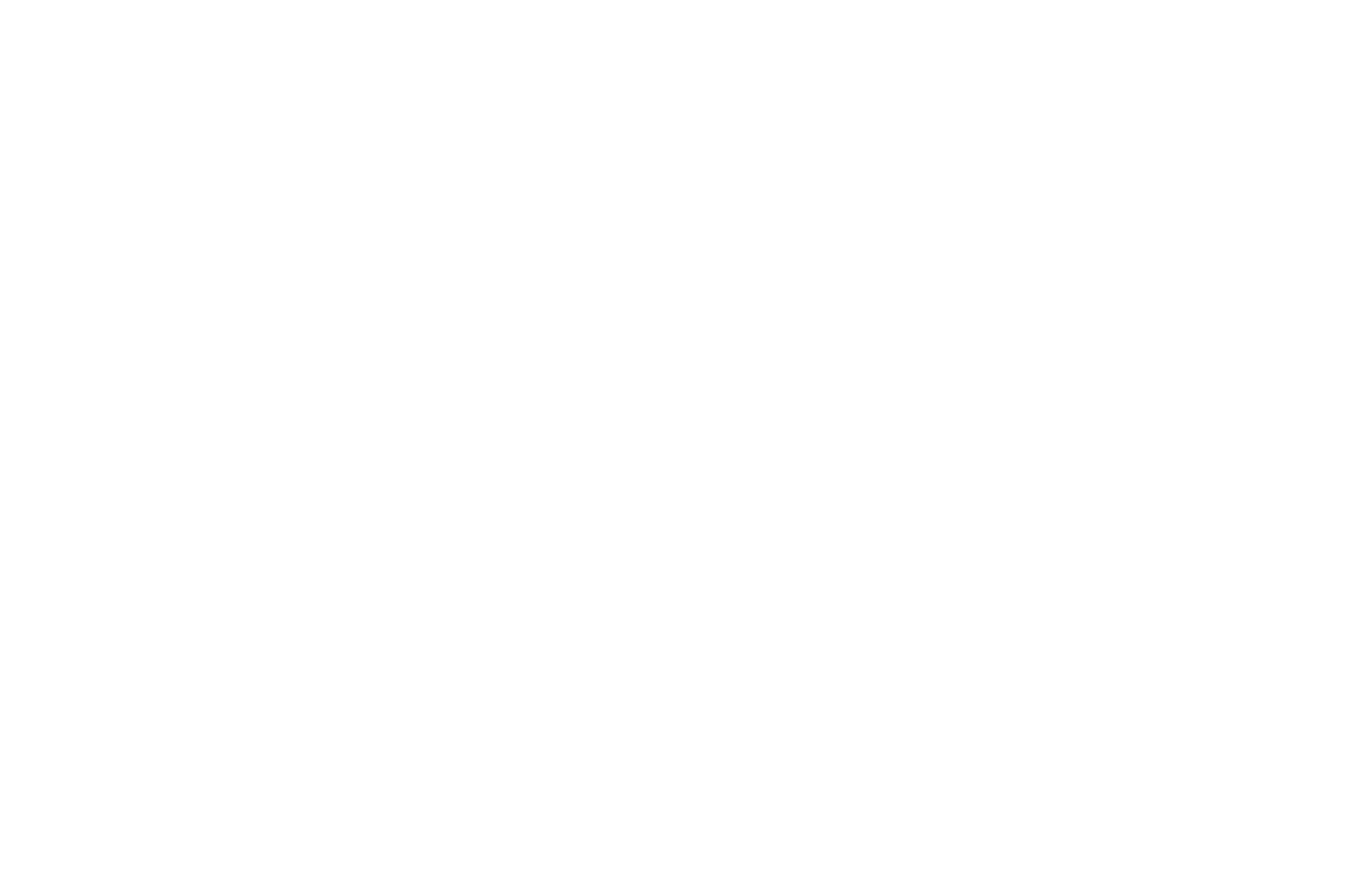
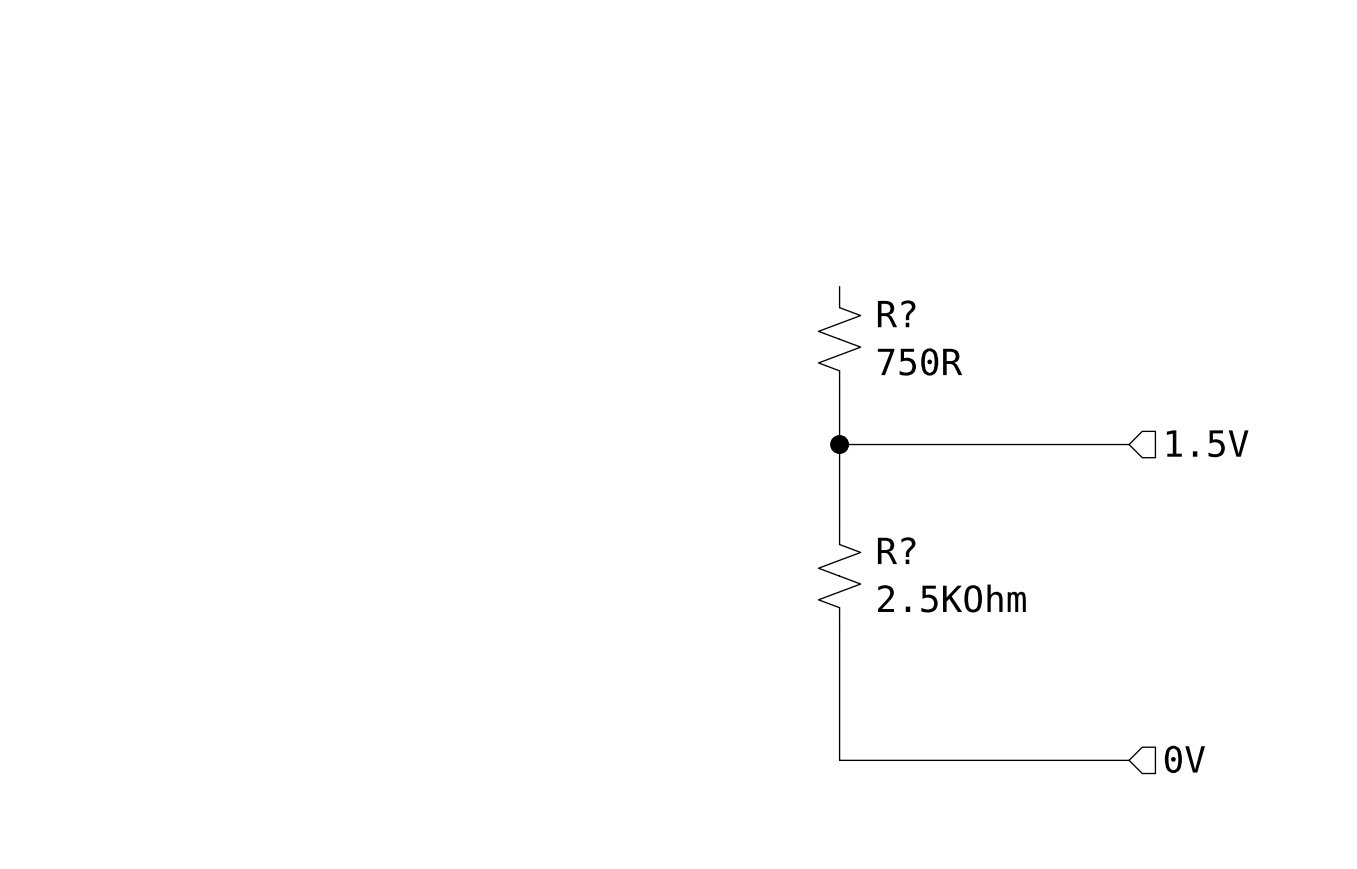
R?: none -> 750R (839, 339)
wire: none -> (839, 391) (839, 523)
hierarchical label: none -> 1.5V (1207, 443)
wire: none -> (839, 444) (1129, 444)
junction: none -> (839, 444)
R?: none -> 2.5KOhm (839, 576)
wire: none -> (839, 628) (839, 760) (1129, 760)
hierarchical label: none -> 0V (1184, 759)

